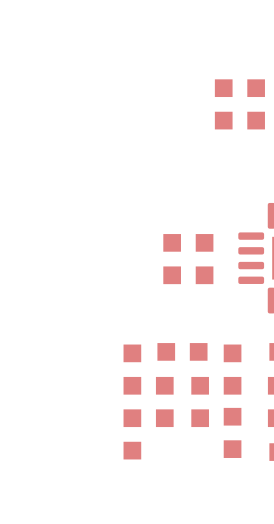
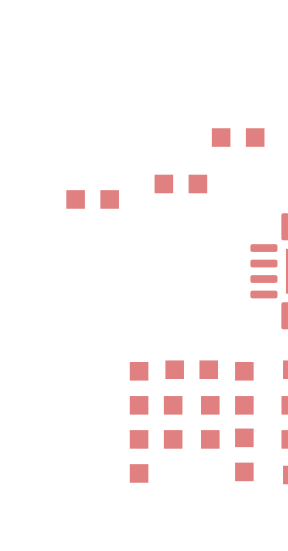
part: (223, 104) -> none
part: (256, 104) -> none
part: none -> (238, 137)
part: none -> (180, 183)
part: none -> (92, 199)
part: (188, 242) -> none
part: (188, 275) -> none

